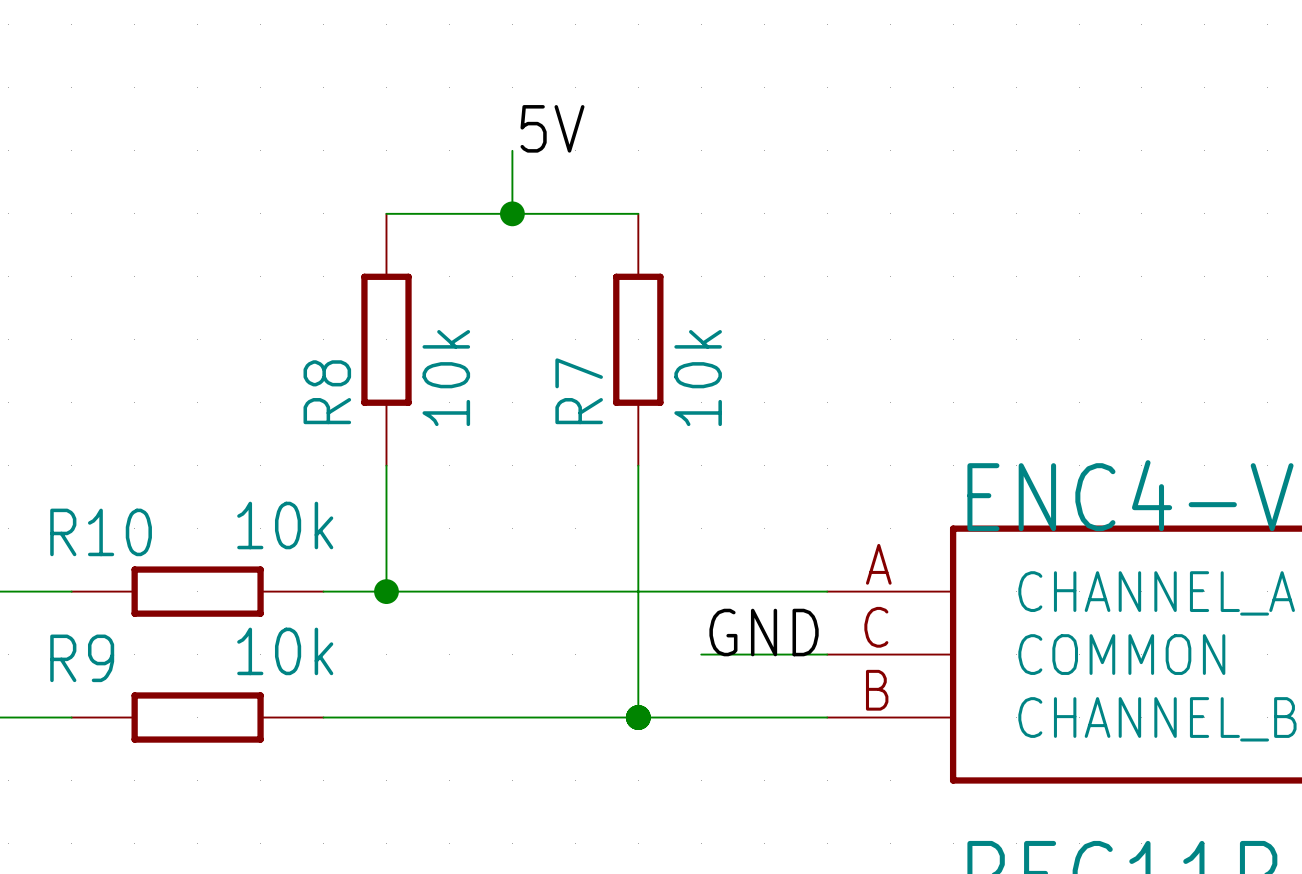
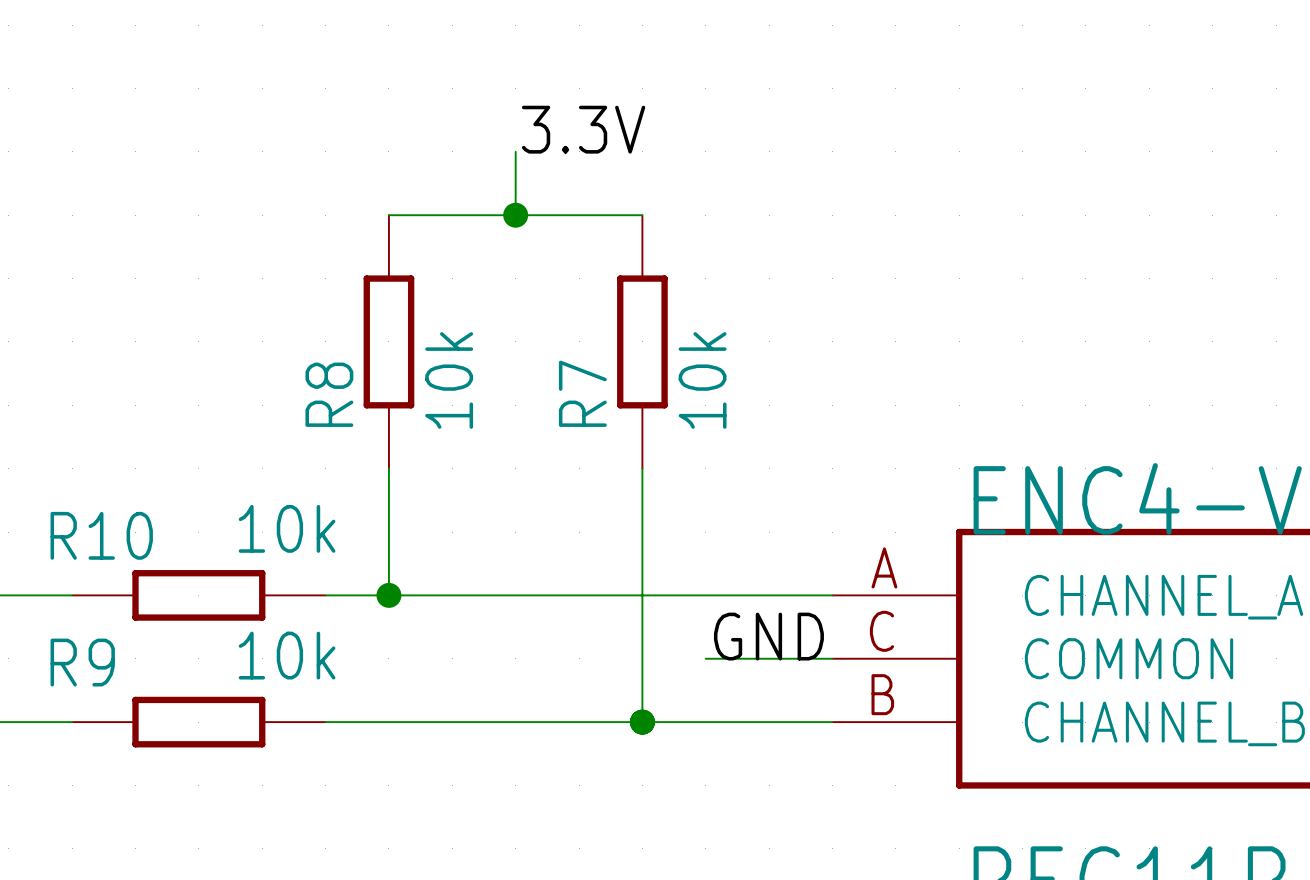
label: 5V (552, 128) -> 3.3V (583, 129)

